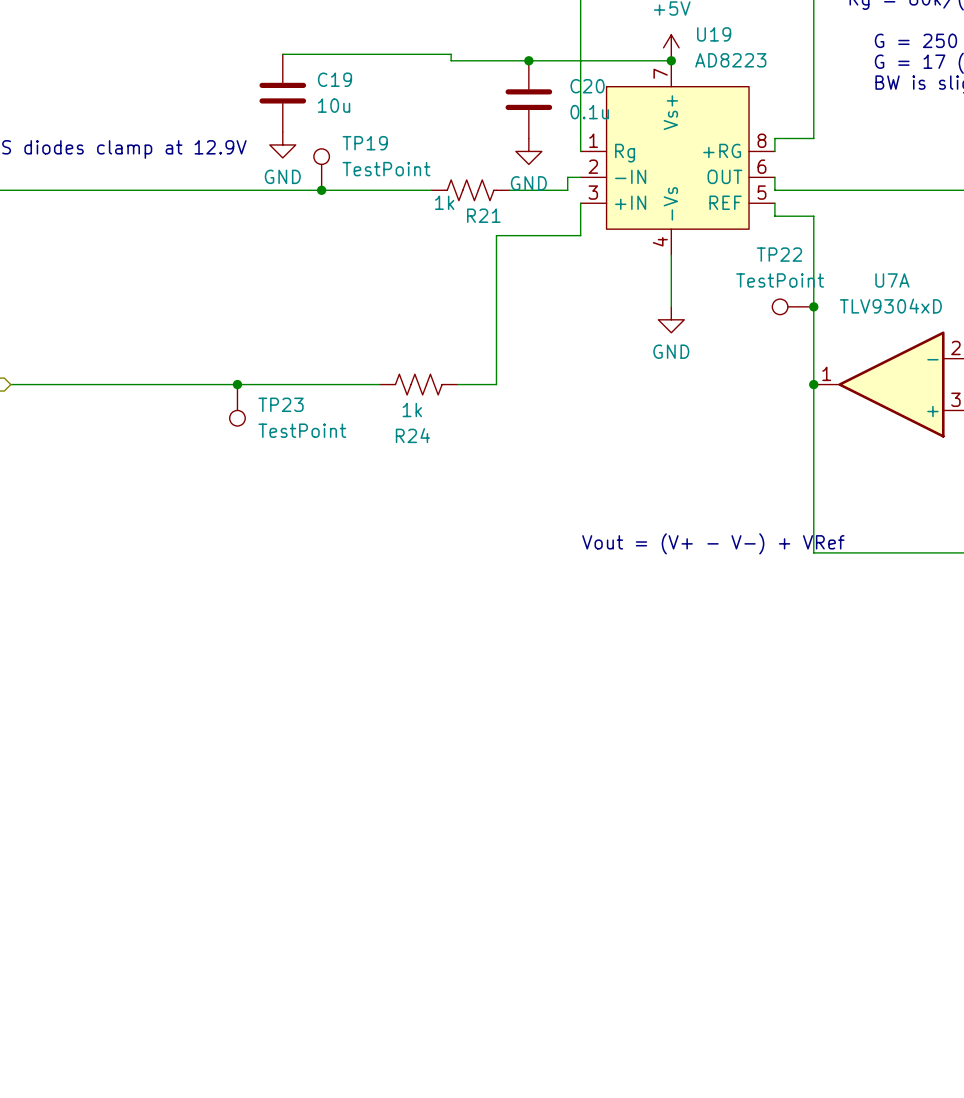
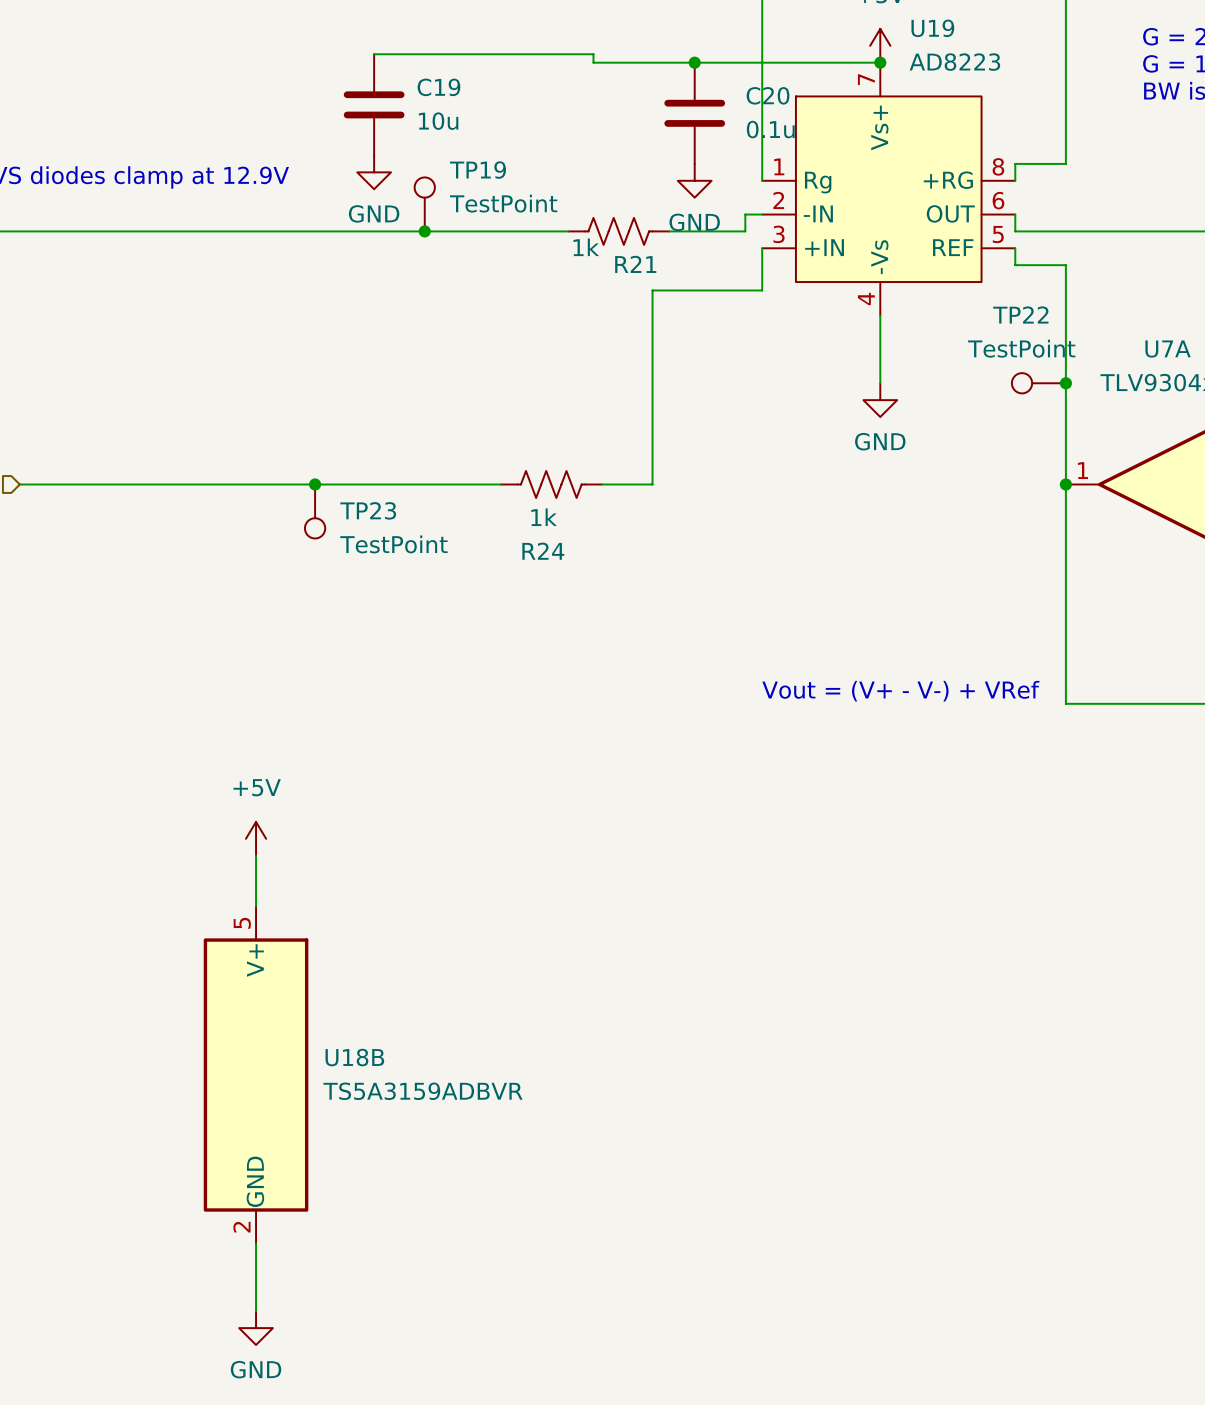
power symbol: none -> +5V (256, 838)
wire: none -> (256, 855) (256, 906)
U18B: none -> TS5A3159ADBVR (256, 1075)
wire: none -> (256, 1243) (256, 1311)
power symbol: none -> GND (256, 1328)

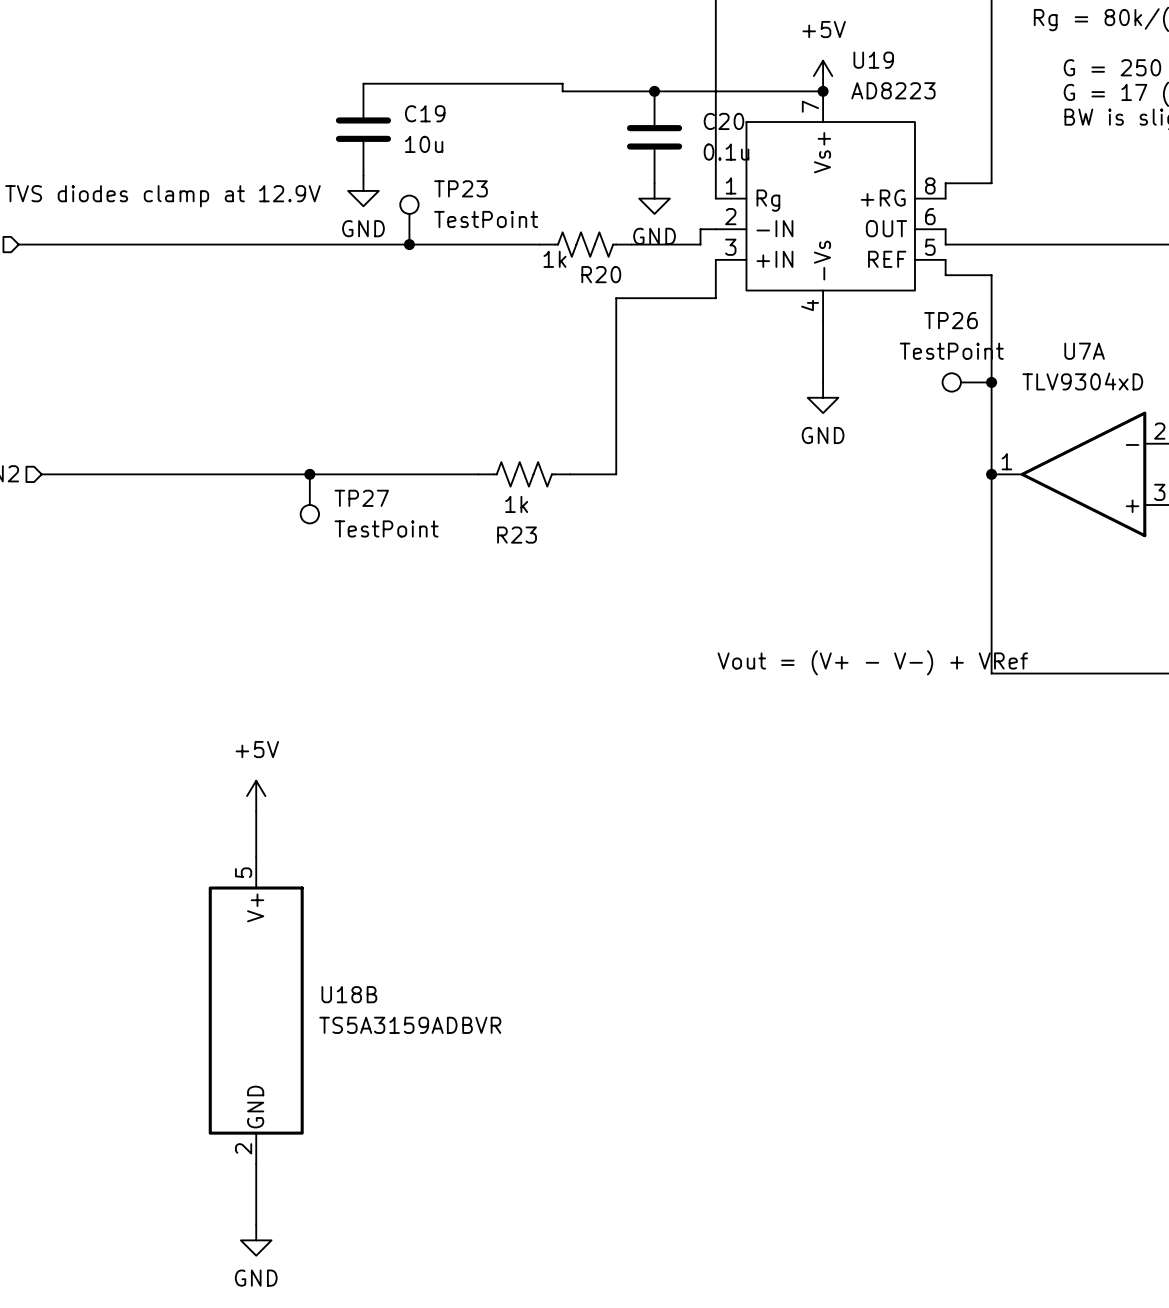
TP19 name: TP19 (477, 170) -> TP23 (460, 188)
R21 name: R21 (635, 264) -> R20 (601, 274)
TP22 name: TP22 (1020, 314) -> TP26 (951, 320)
TP23 name: TP23 (368, 510) -> TP27 (361, 498)
R24 name: R24 (543, 551) -> R23 (517, 535)

